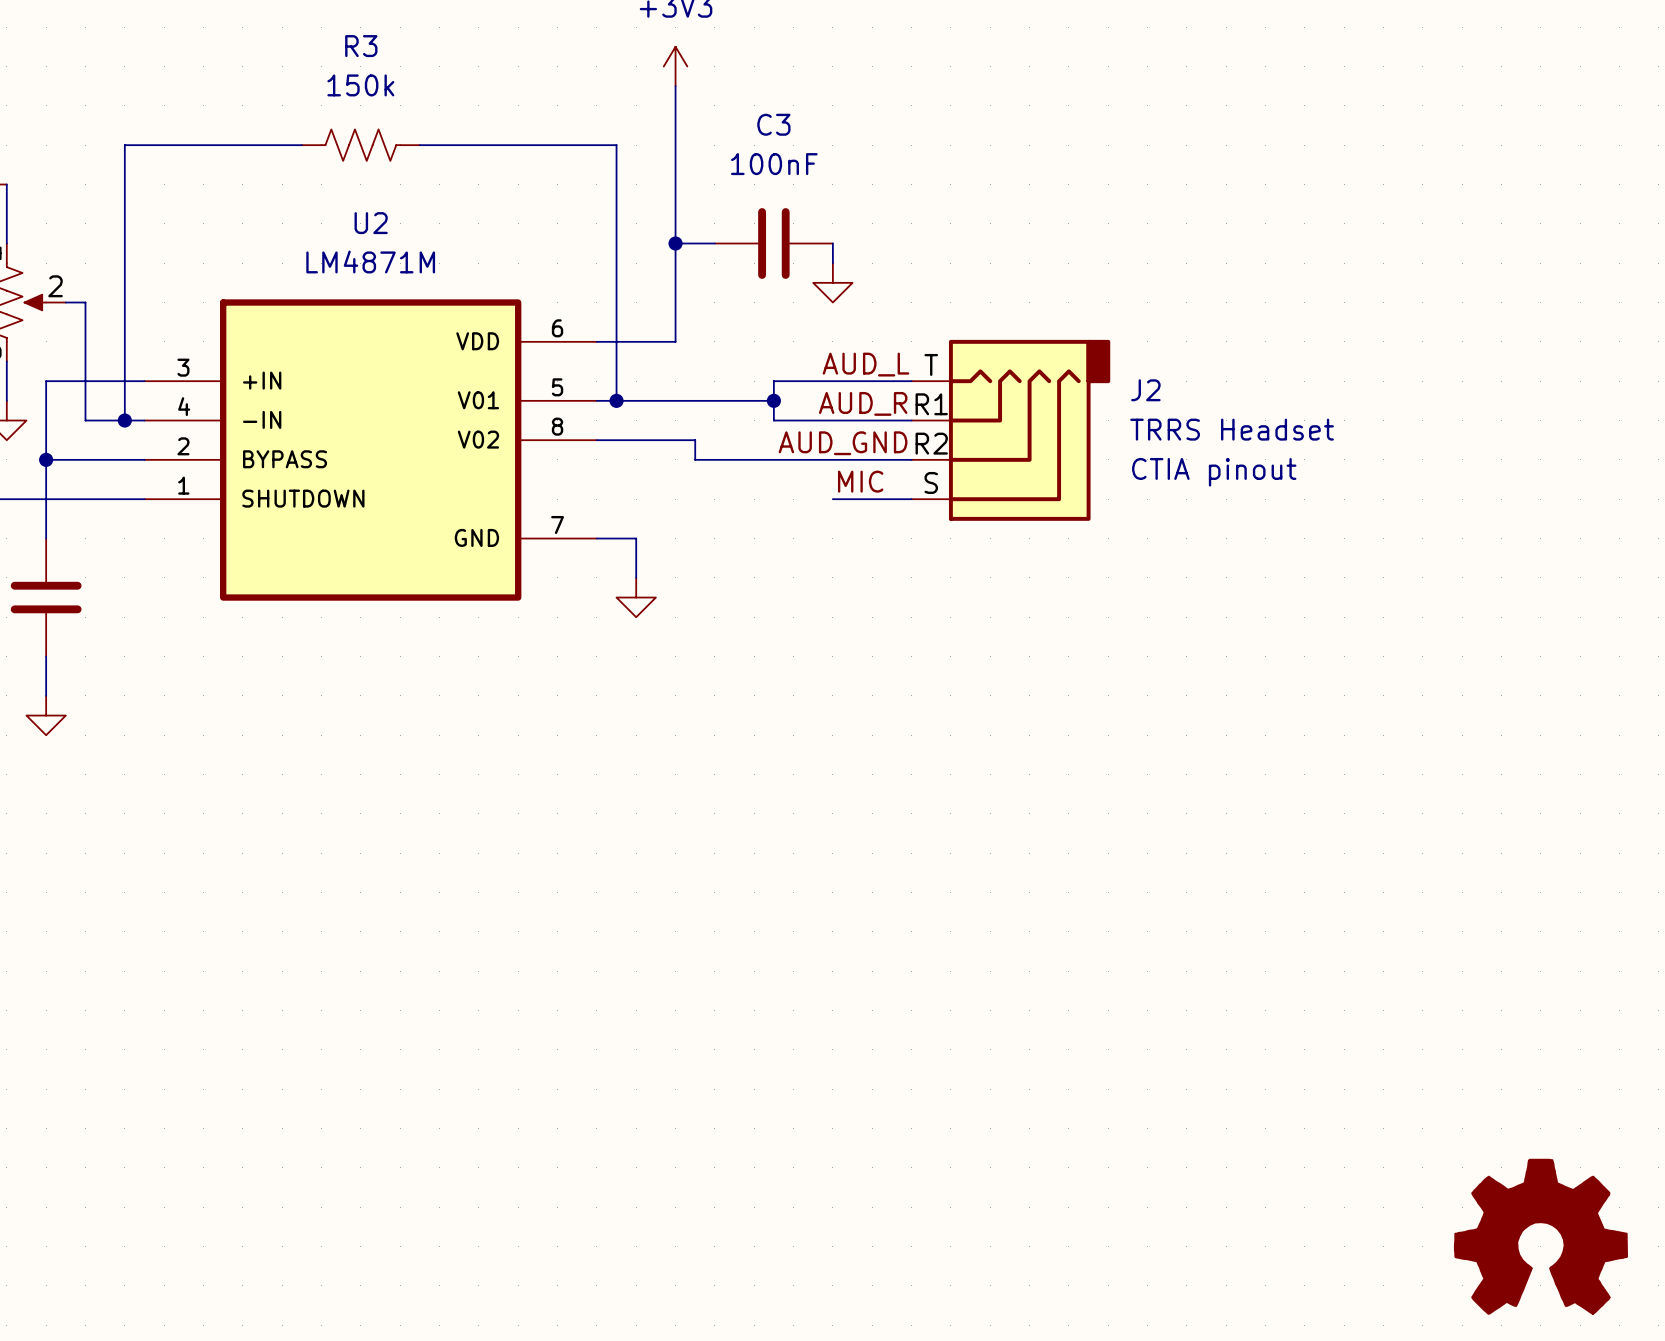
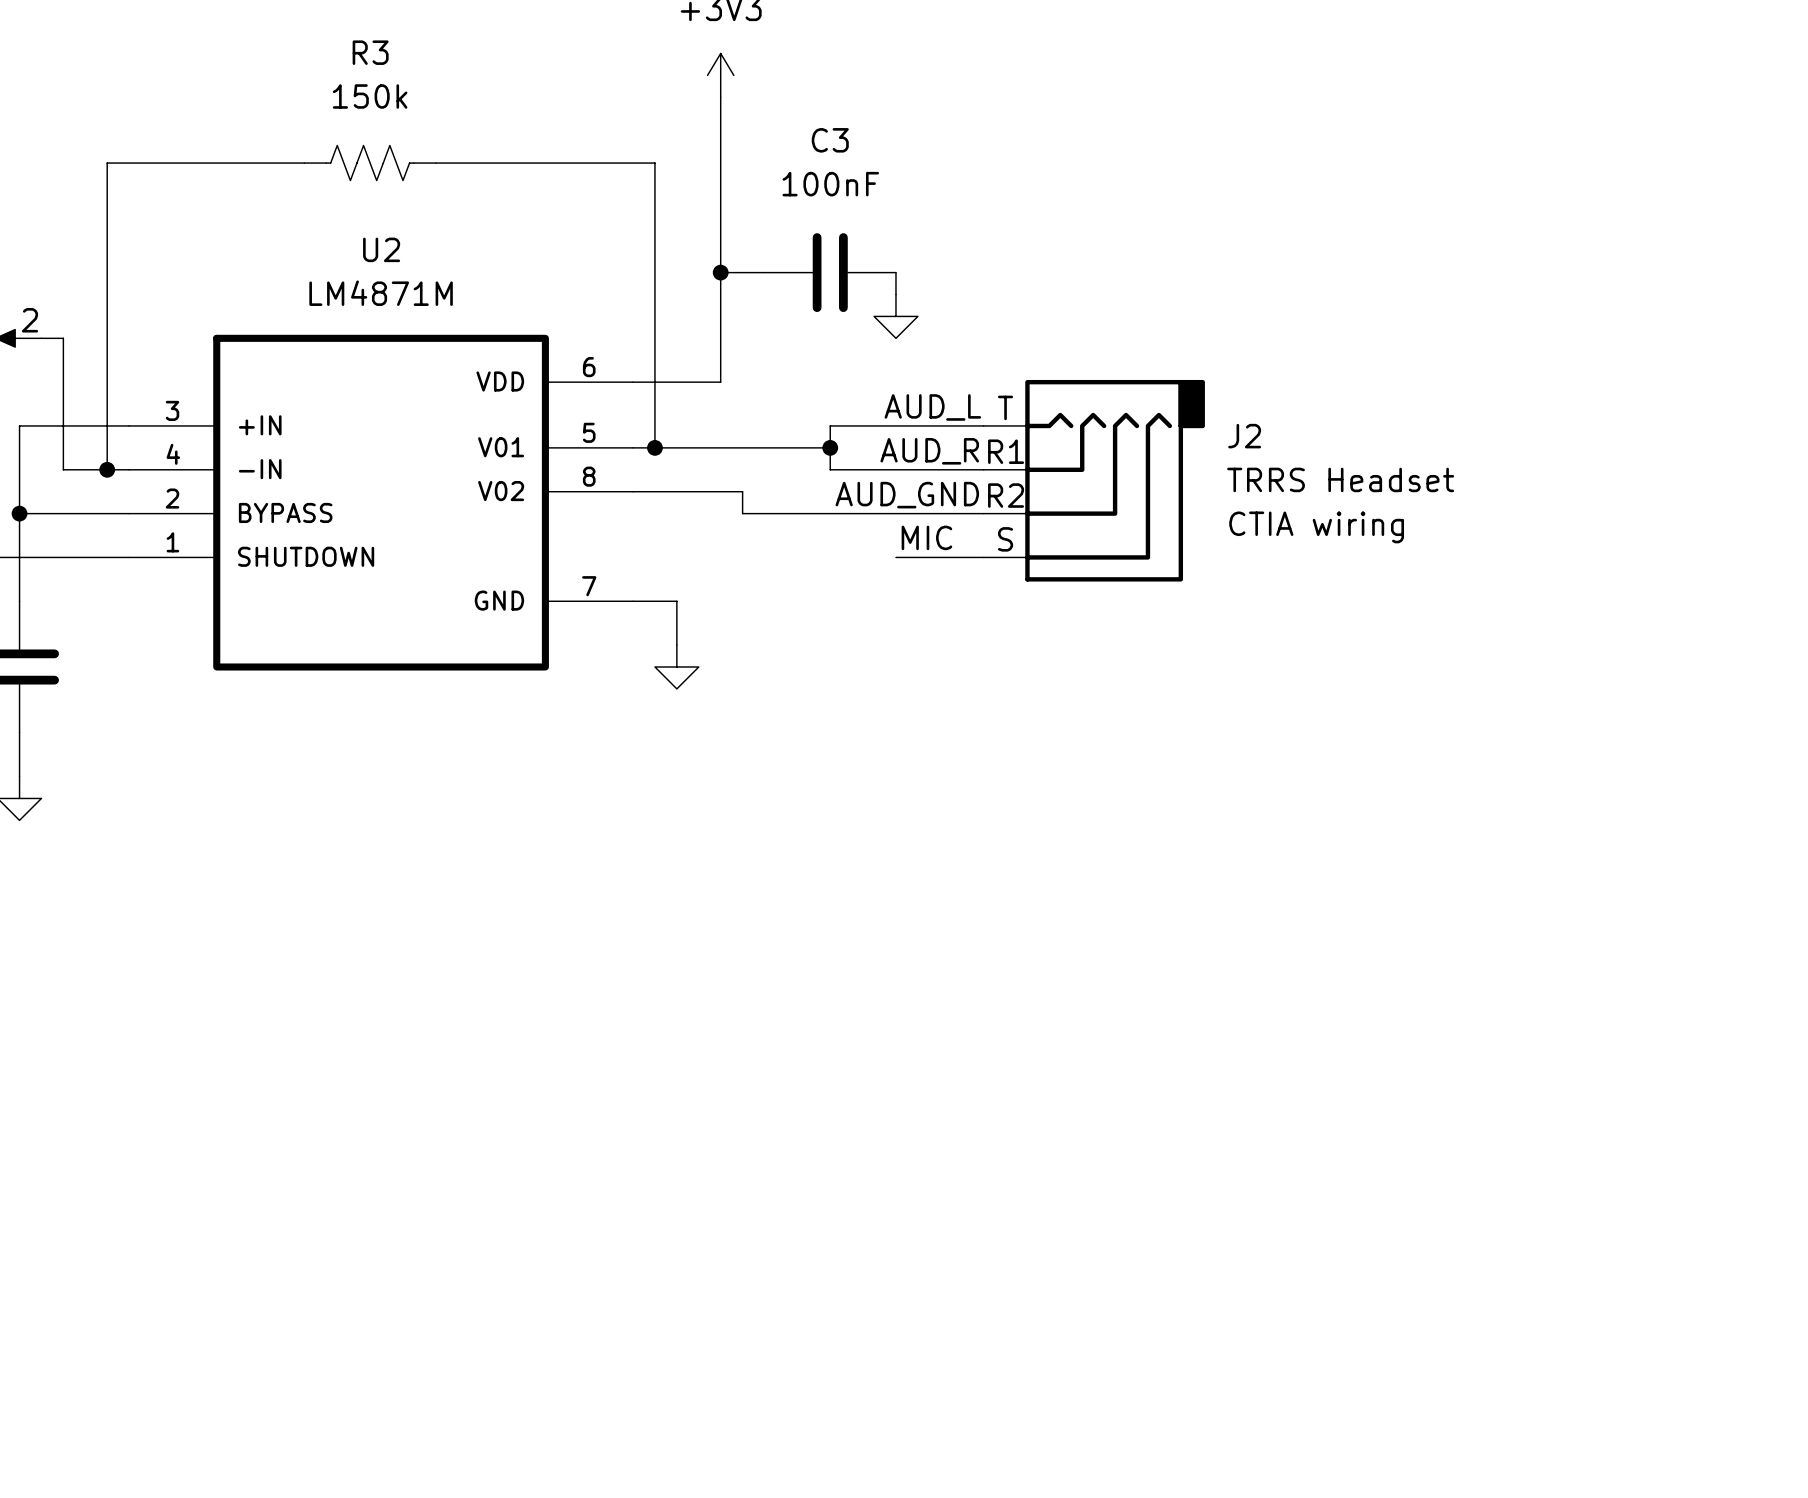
J2 text: CTIA pinout (1214, 472) -> CTIA wiring (1316, 527)
power symbol: (1540, 1236) -> none

